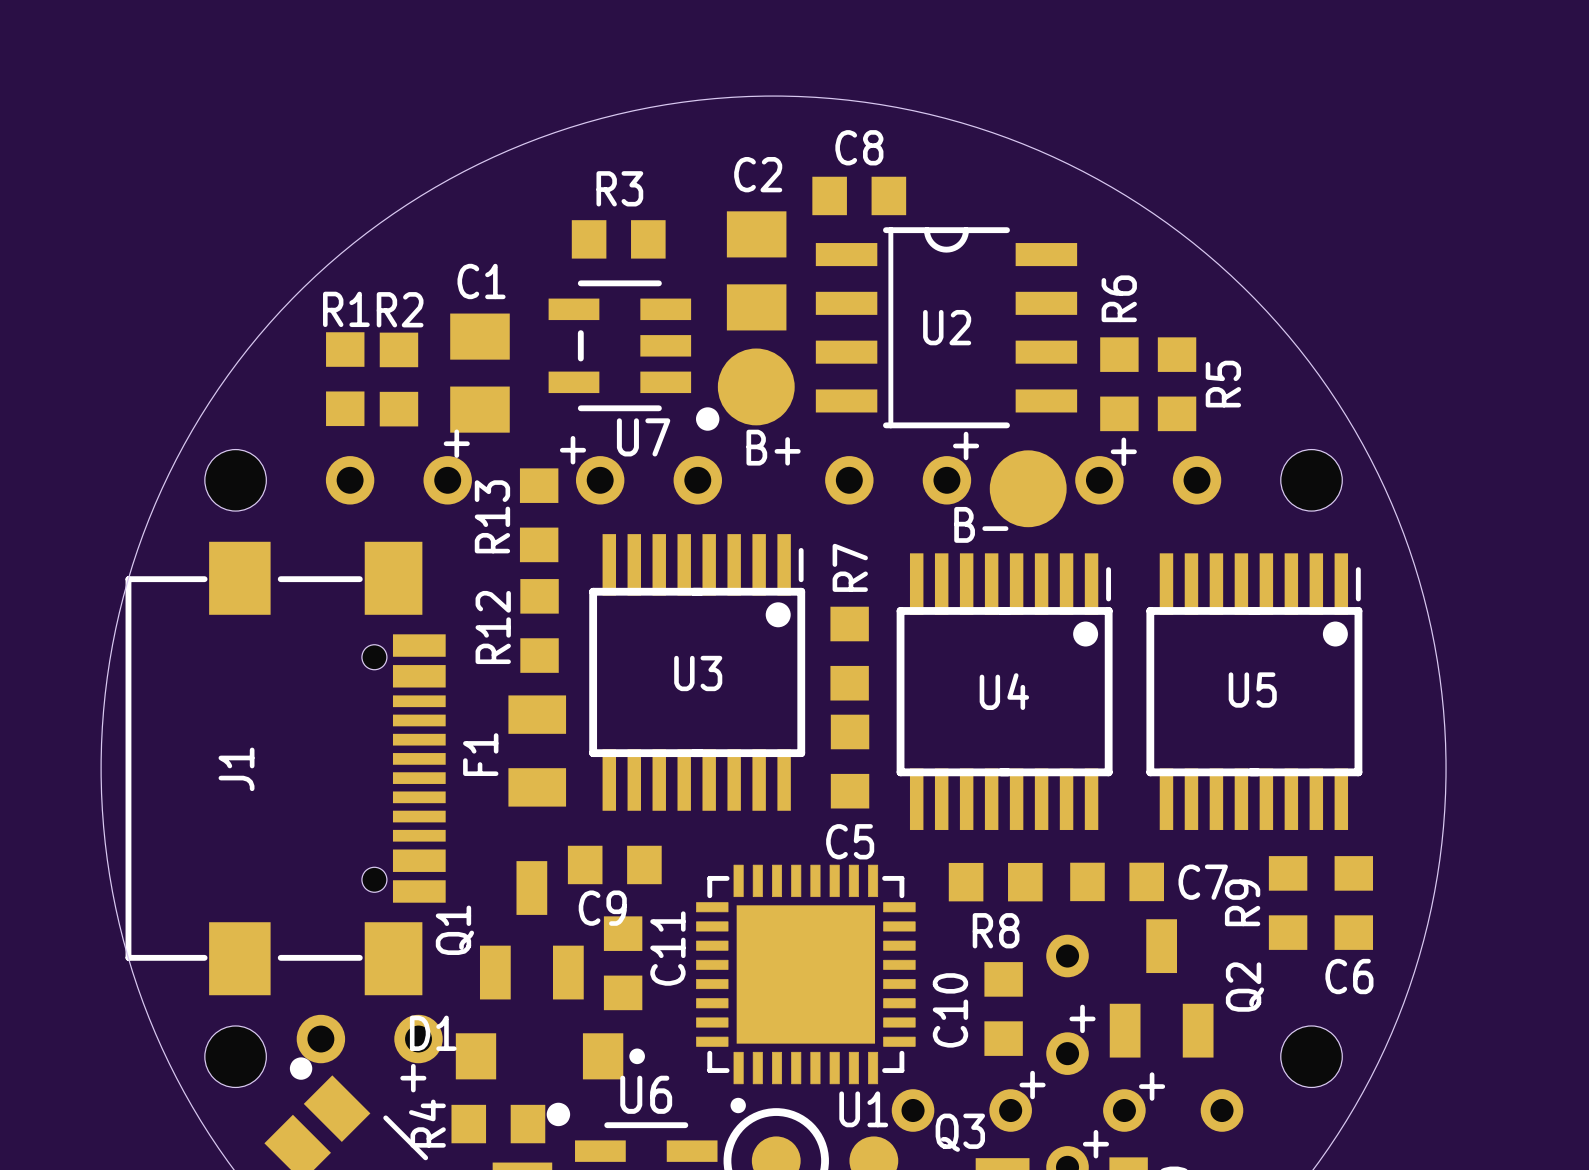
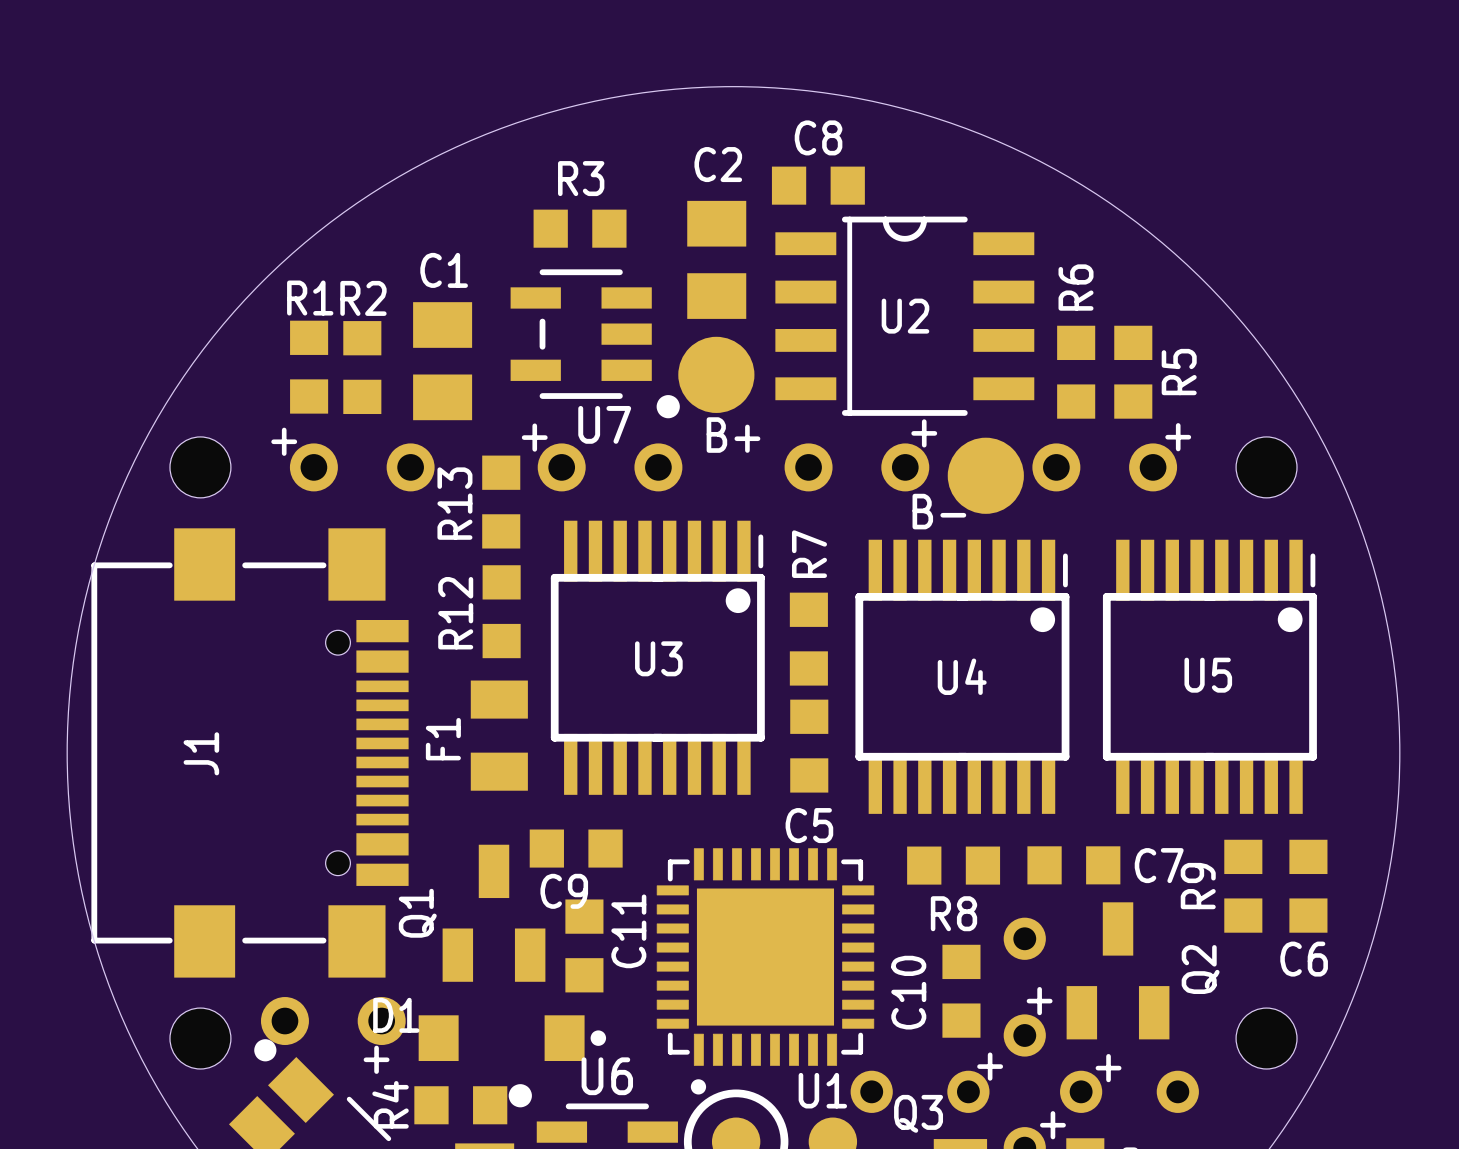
text position: + (456, 443) -> + (284, 441)
text position: + (1123, 451) -> + (1178, 437)

